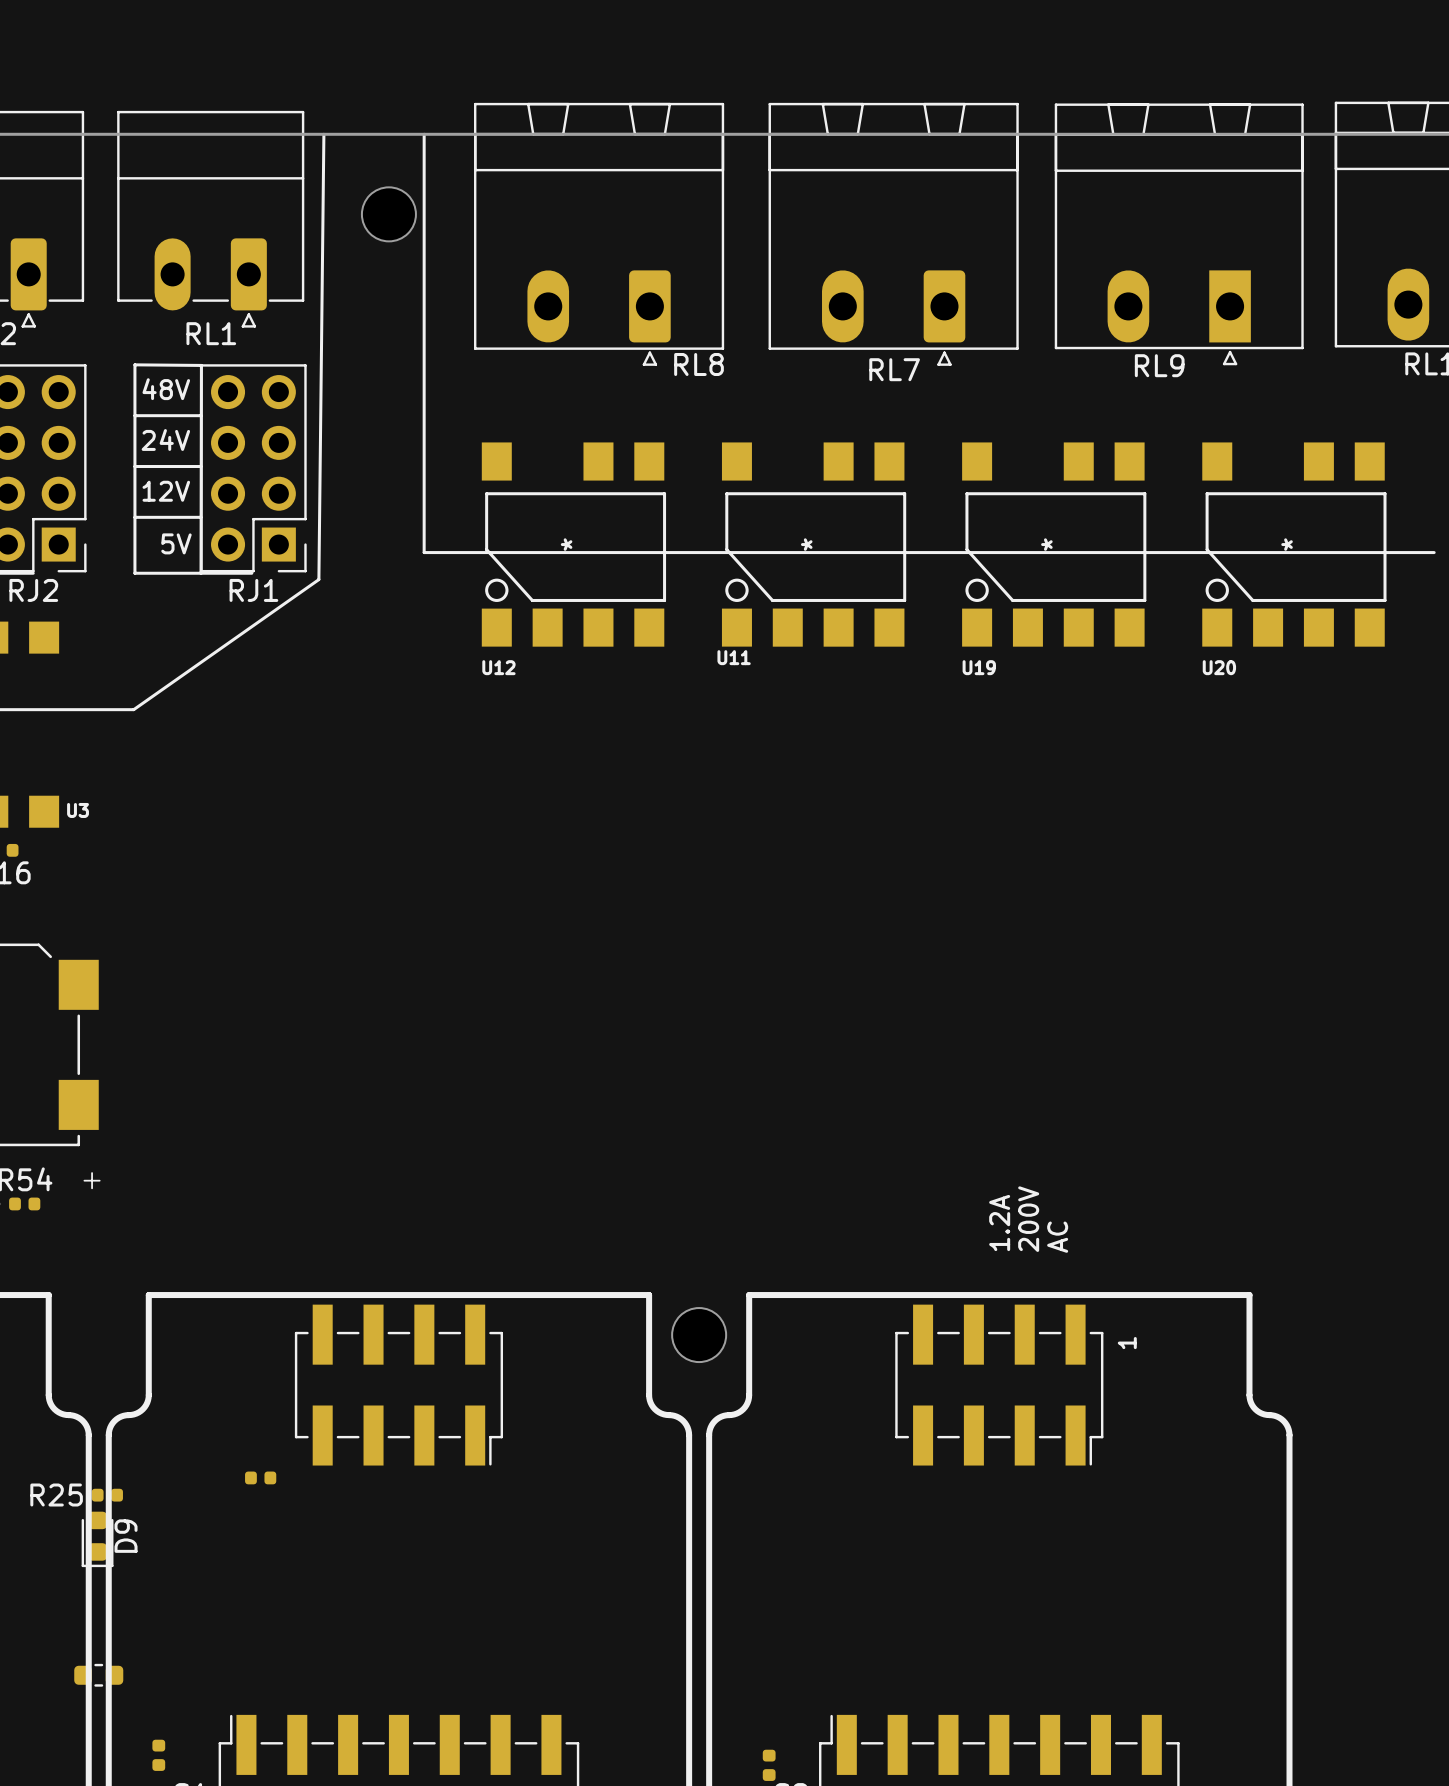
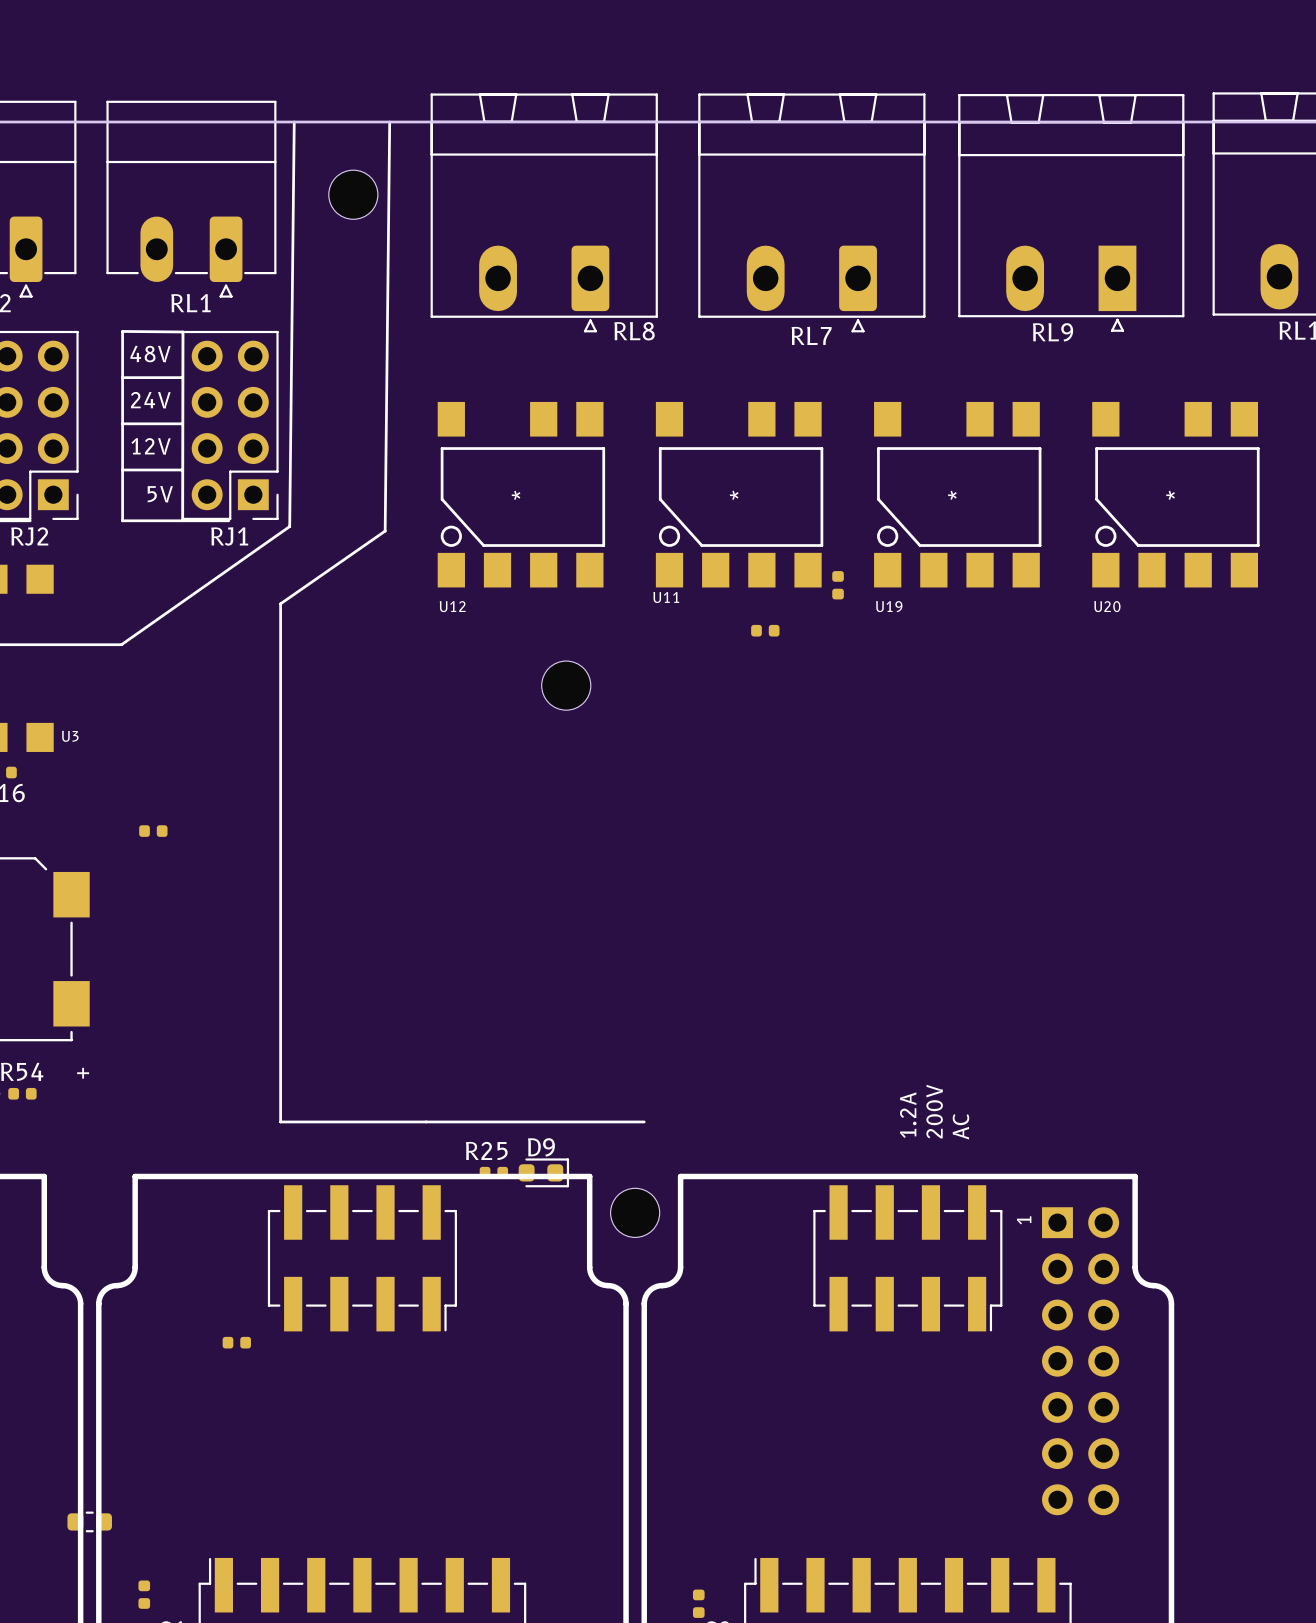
line: (424, 134) (424, 552) (1434, 552) -> none
line: none -> (389, 122) (385, 531) (280, 603) (280, 1121) (644, 1121)
part: none -> (838, 585)
part: none -> (765, 630)
part: none -> (566, 685)
part: none -> (153, 831)
R25 name position: R25 (56, 1495) -> R25 (486, 1150)
R25 position: (107, 1495) -> (493, 1172)
part: none -> (1080, 1361)
D9 rotation: 0° (97, 1539) -> 90° counterclockwise (543, 1172)
D9 position: (97, 1539) -> (543, 1172)

